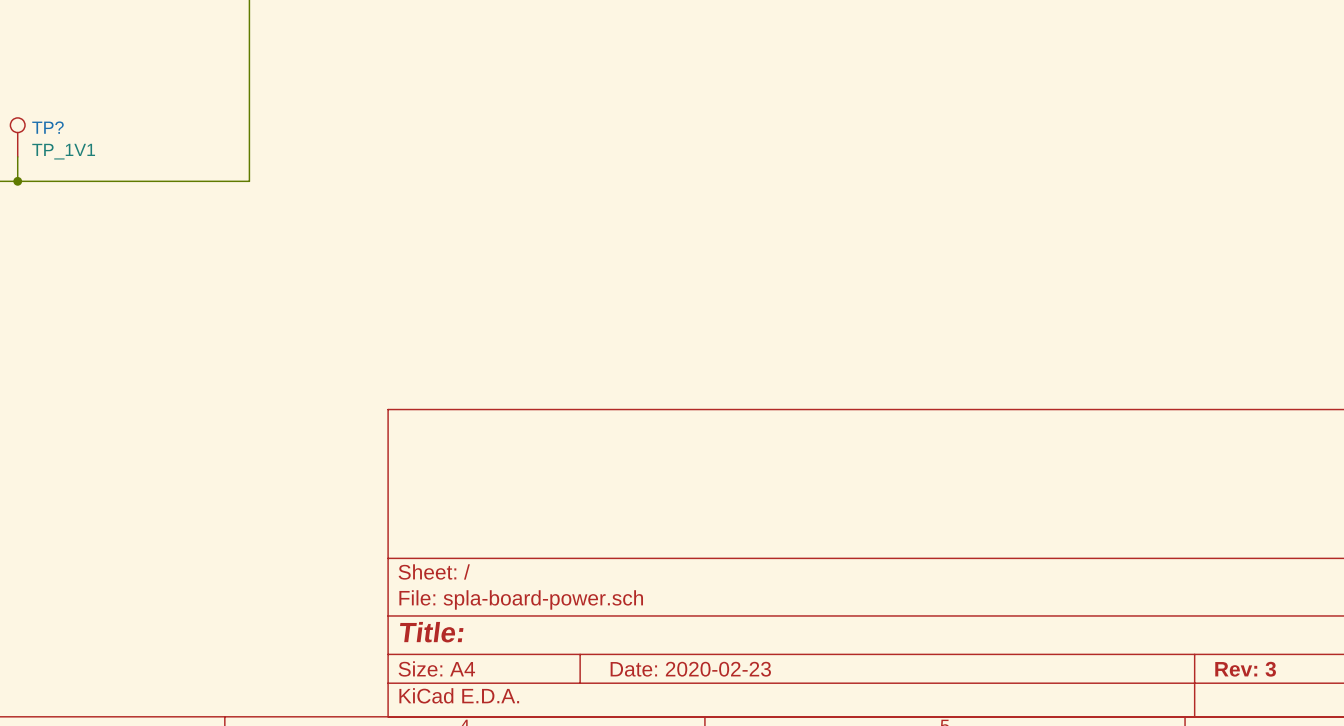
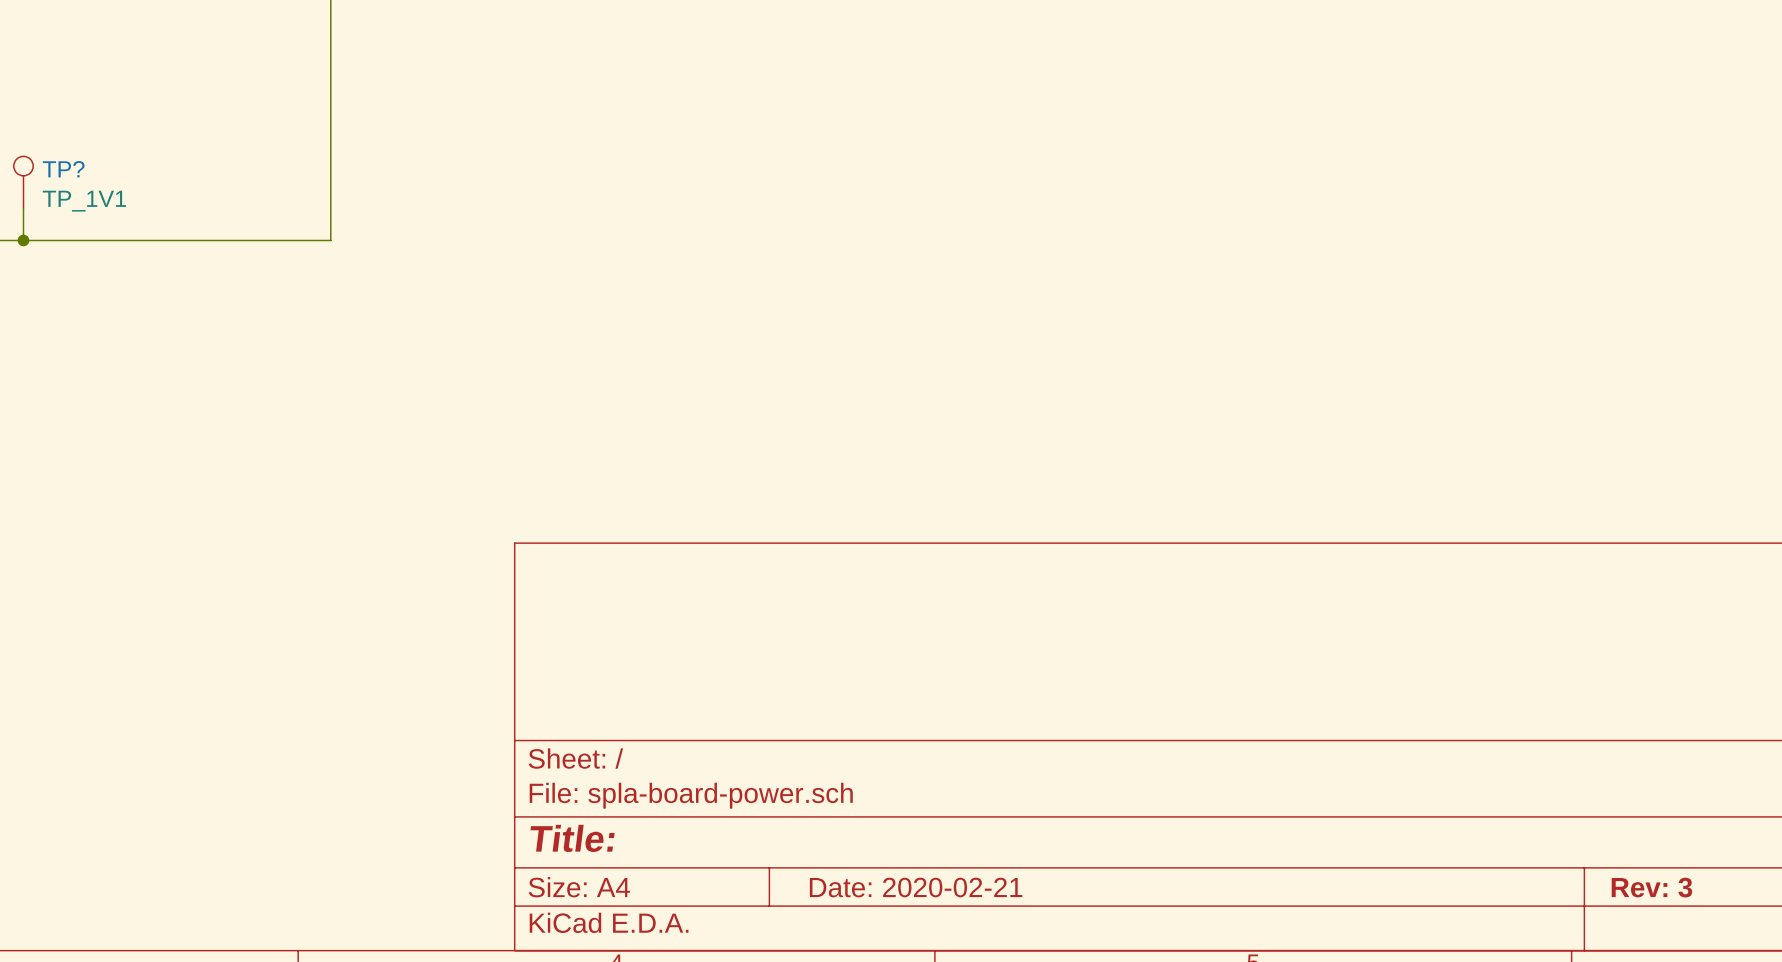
title block: Date: 2020-02-23 (690, 669) -> Date: 2020-02-21 (916, 887)

